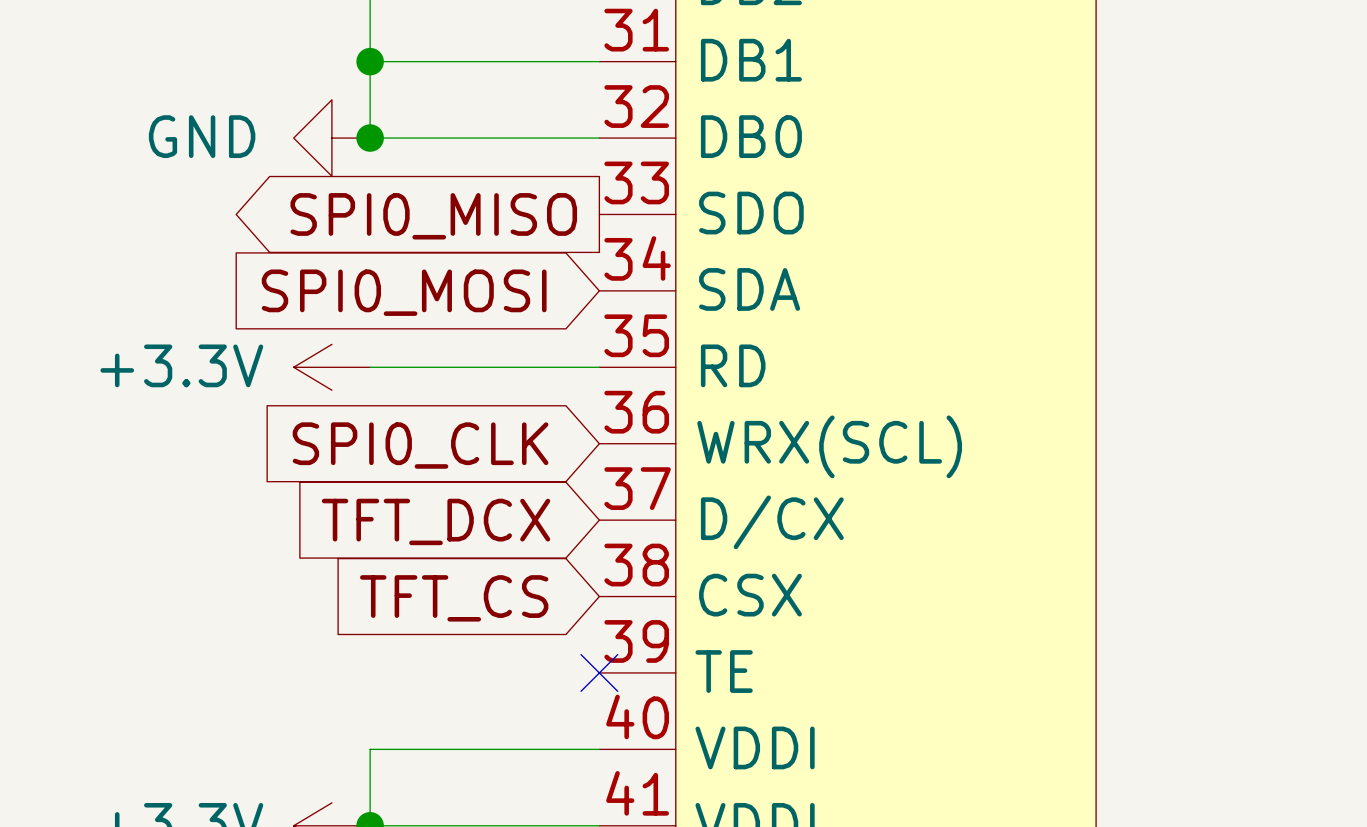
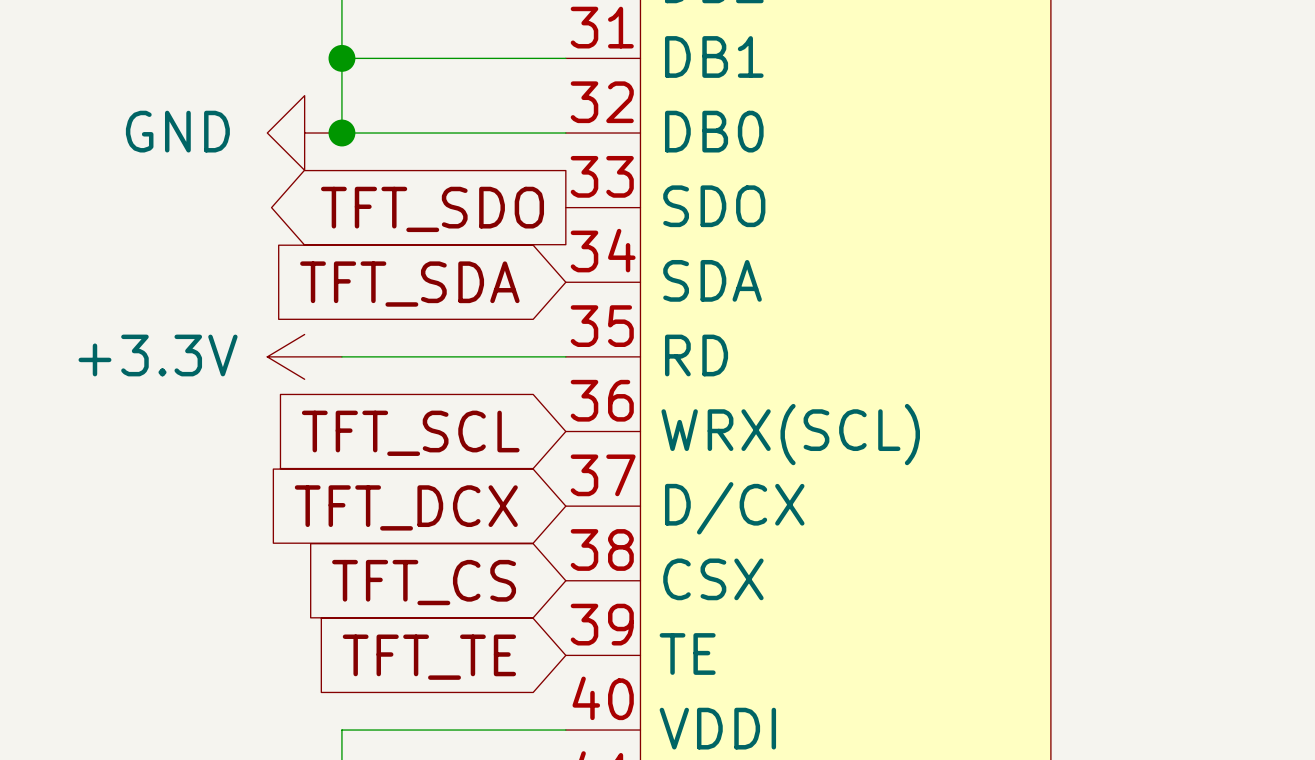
global label: SPI0_MISO (433, 216) -> TFT_SDO (432, 209)
global label: SPI0_MOSI (404, 292) -> TFT_SDA (409, 284)
global label: SPI0_CLK (420, 445) -> TFT_SCL (410, 433)
no-connect mark: (599, 672) -> none
global label: none -> TFT_TE (429, 657)

